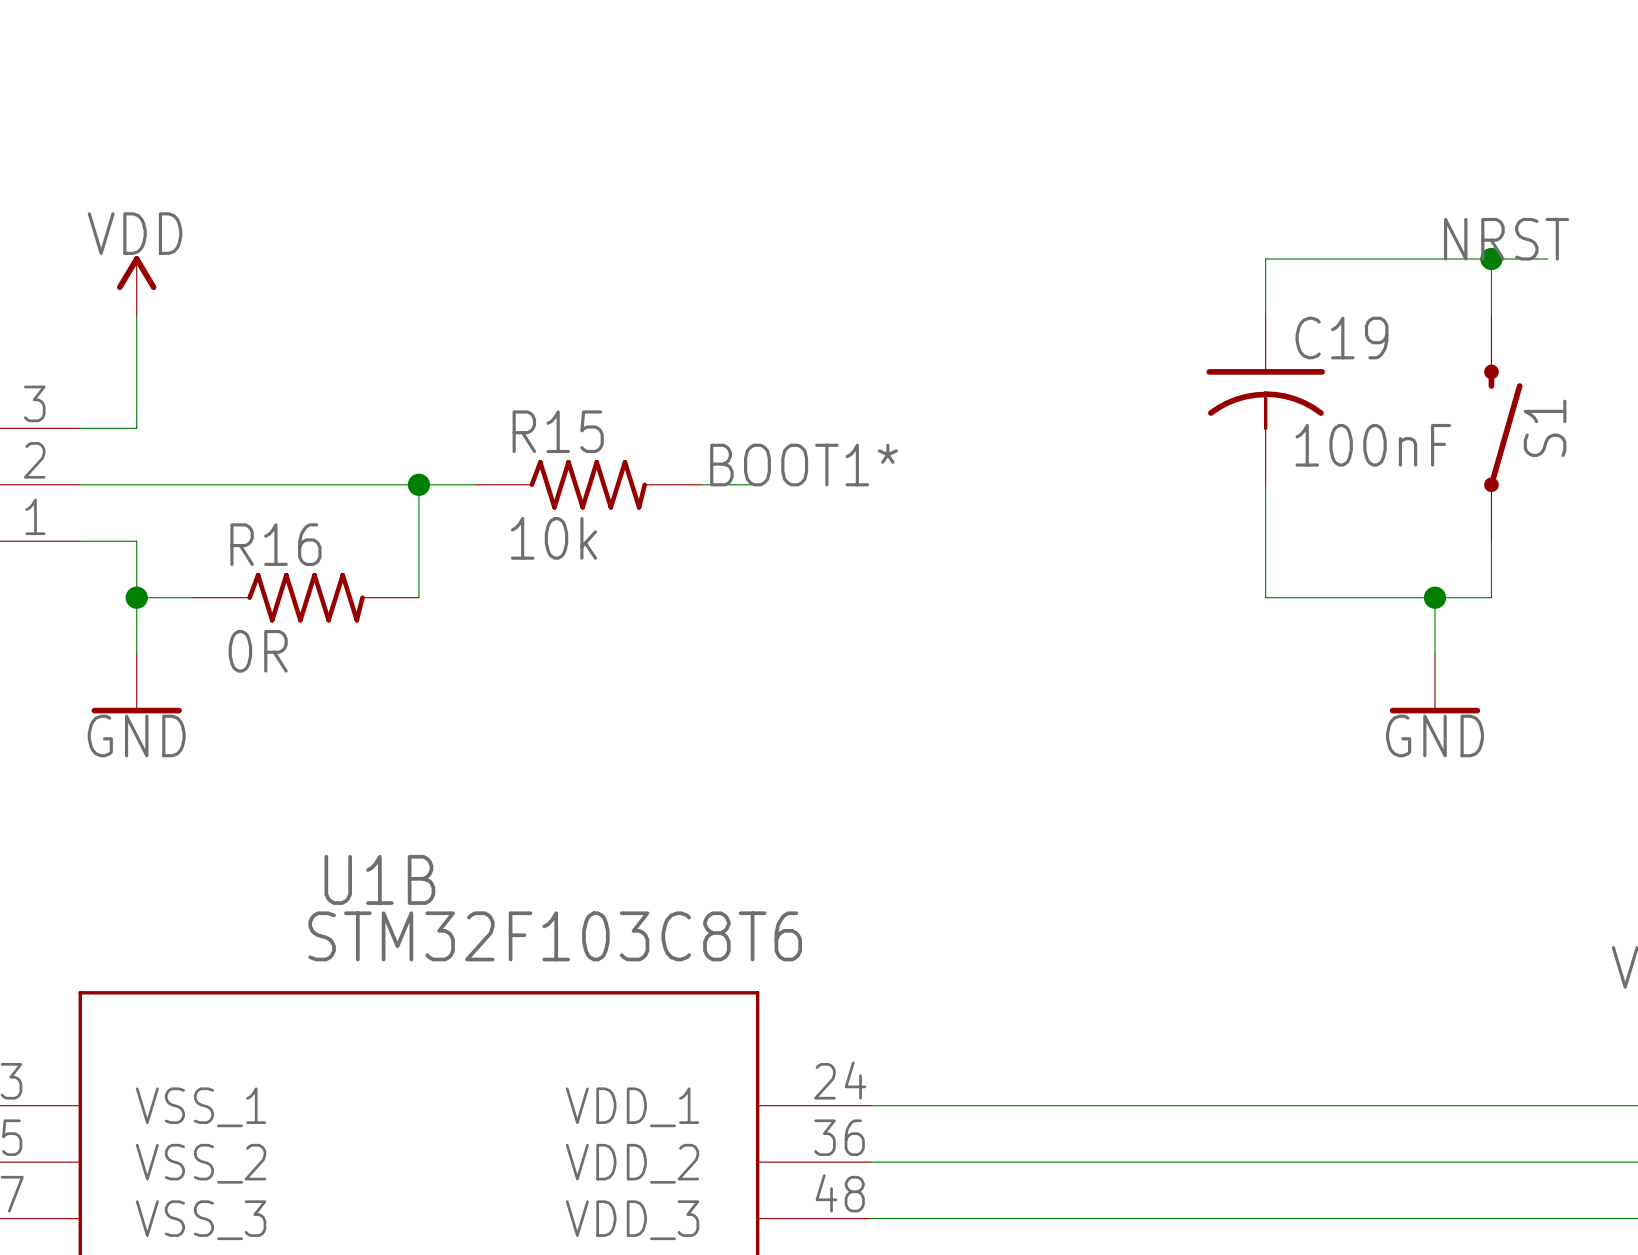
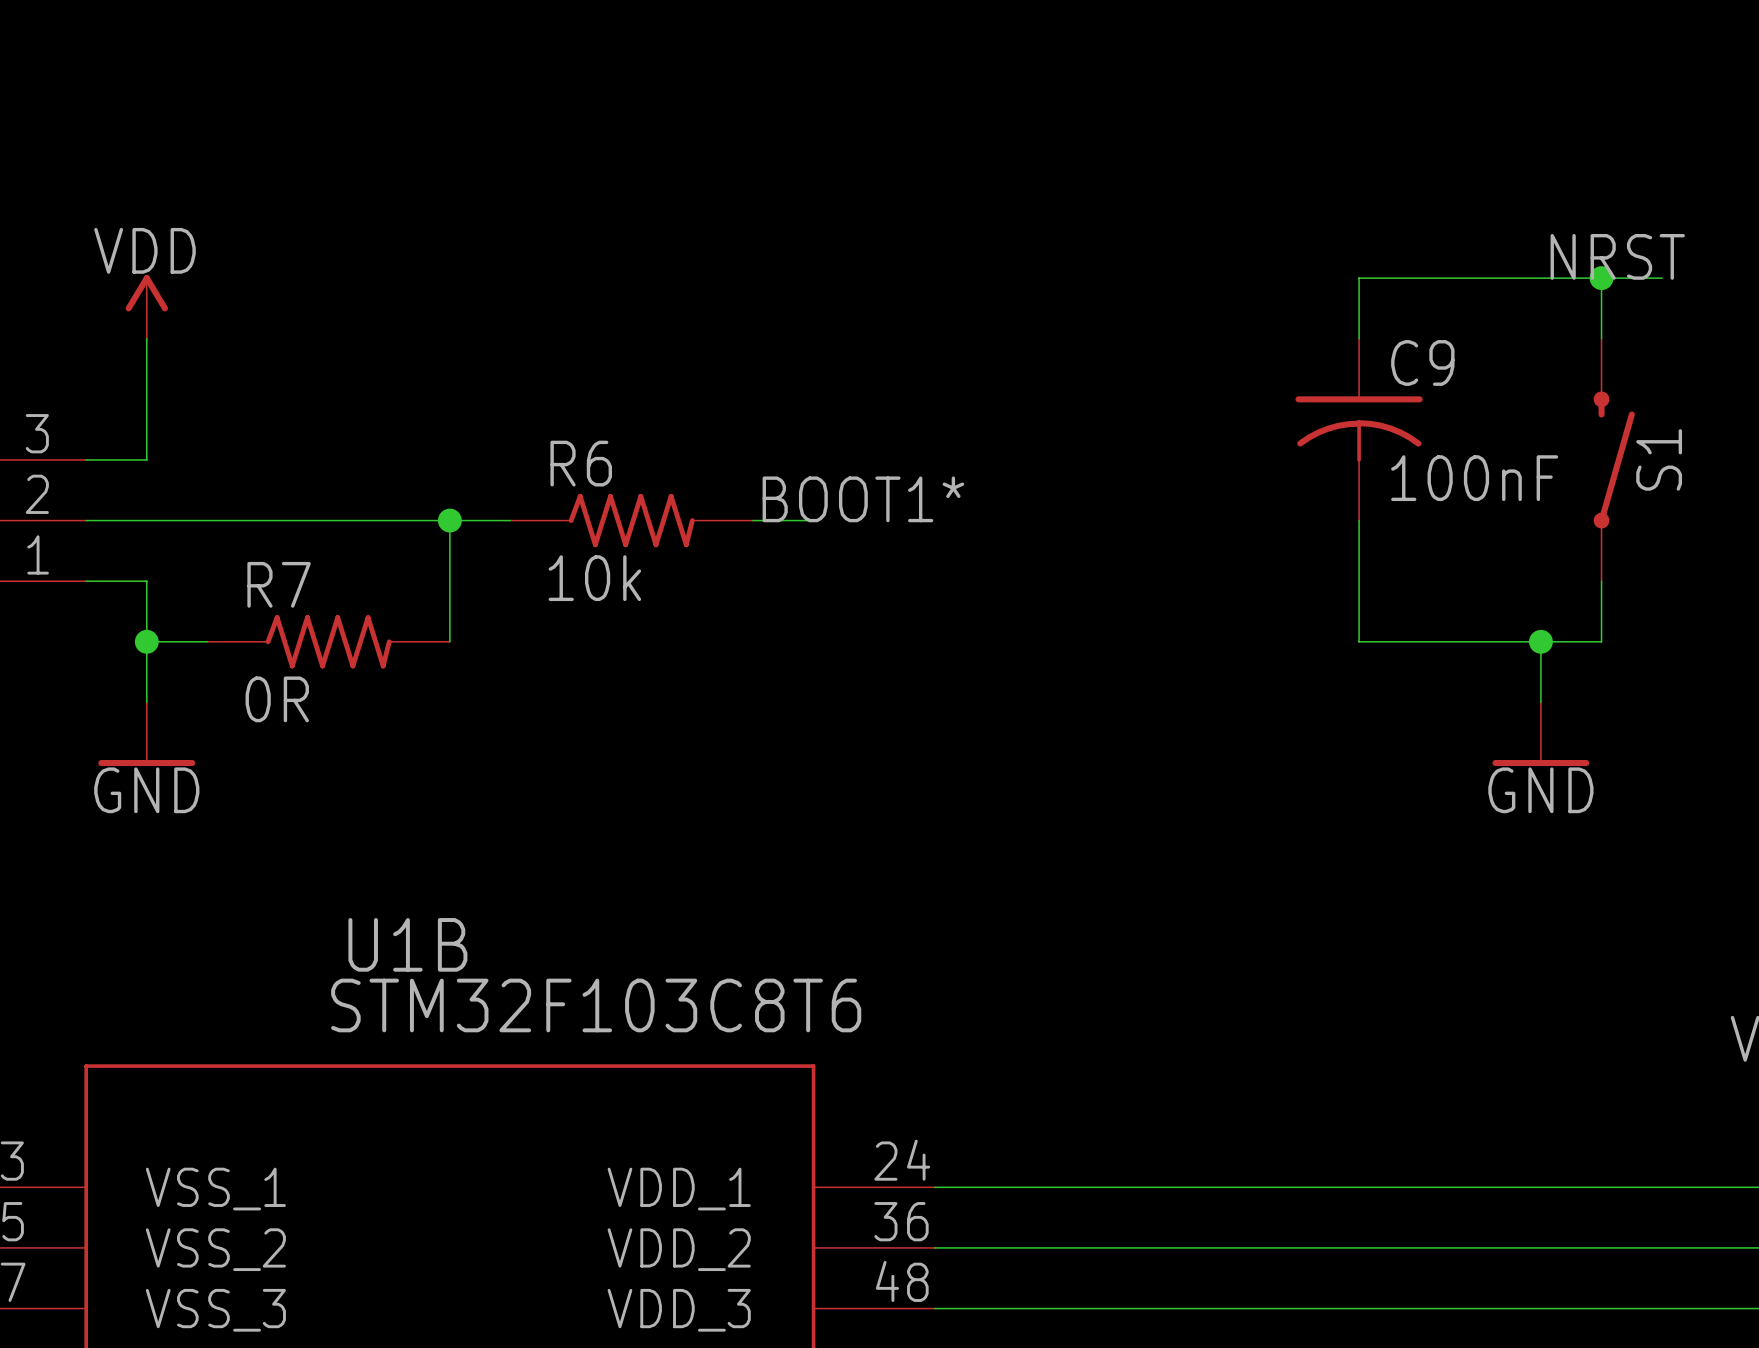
C19 name: C19 (1341, 338) -> C9 (1422, 362)
R15 name: R15 (558, 431) -> R6 (581, 463)
R16 name: R16 (275, 544) -> R7 (279, 584)

